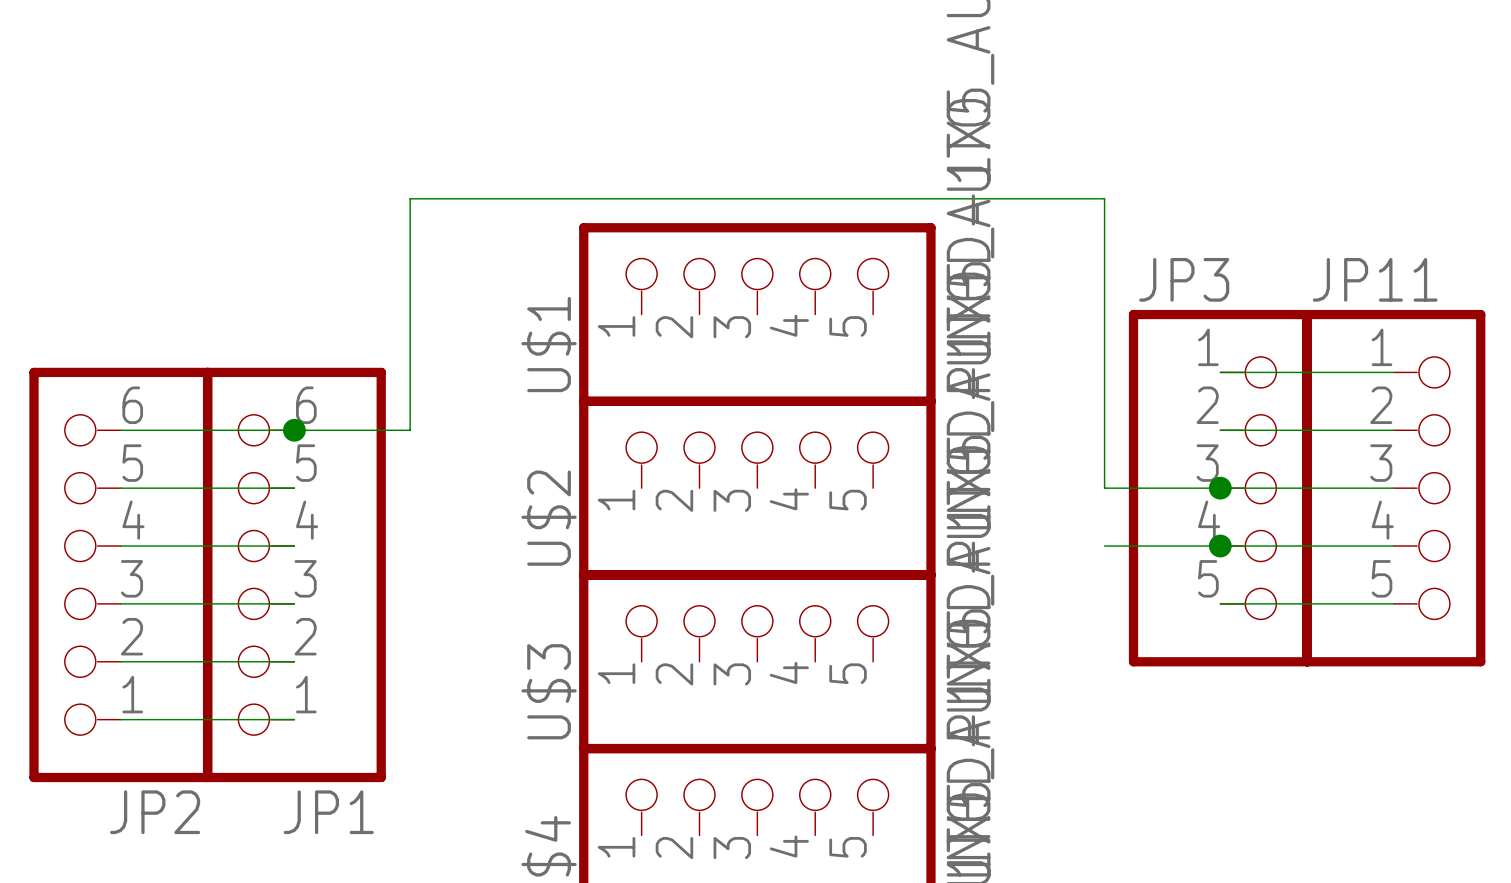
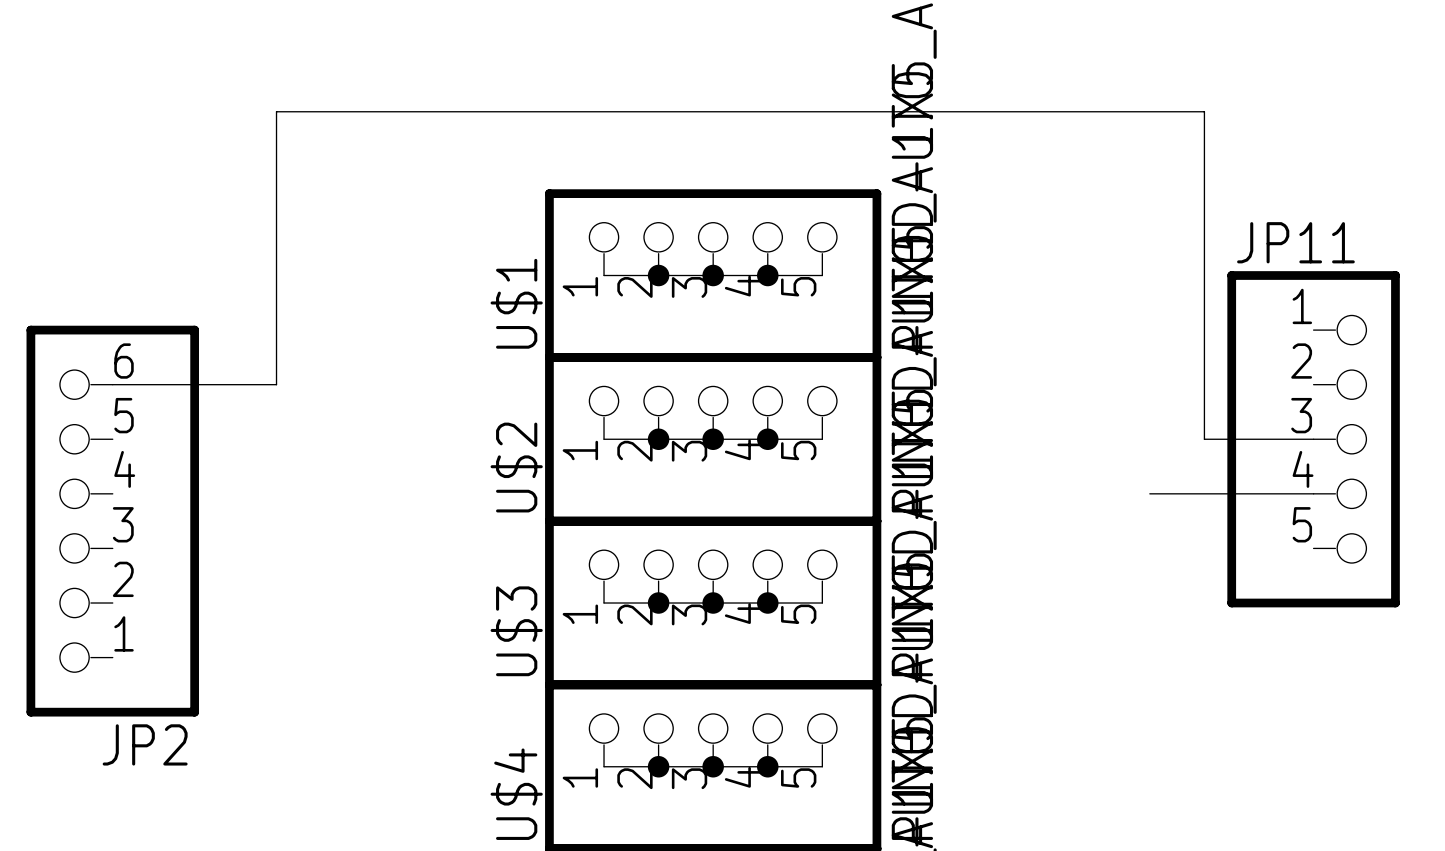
wire: none -> (604, 275) (822, 275)
junction: none -> (658, 275)
junction: none -> (713, 275)
junction: none -> (767, 275)
wire: (1220, 372) (1393, 372) -> none
wire: (294, 430) (410, 430) (410, 198) (1104, 198) (1104, 488) (1278, 488) -> (276, 384) (276, 111) (1204, 111) (1204, 439)
junction: (294, 430) -> none
wire: (1220, 430) (1393, 430) -> none
wire: (120, 488) (294, 488) -> none
wire: none -> (604, 439) (822, 439)
junction: none -> (658, 439)
junction: none -> (713, 439)
junction: none -> (767, 439)
JP3: (1220, 488) -> none
junction: (1220, 488) -> none
wire: (120, 546) (294, 546) -> none
wire: (1104, 546) (1220, 546) -> none
junction: (1220, 546) -> none
JP1: (294, 574) -> none
wire: (120, 603) (294, 603) -> none
wire: (1220, 603) (1393, 603) -> none
wire: (120, 661) (294, 661) -> none
wire: none -> (604, 603) (822, 603)
junction: none -> (658, 603)
junction: none -> (713, 603)
junction: none -> (767, 603)
wire: (120, 719) (294, 719) -> none
wire: none -> (604, 766) (822, 766)
junction: none -> (658, 766)
junction: none -> (713, 766)
junction: none -> (767, 766)

